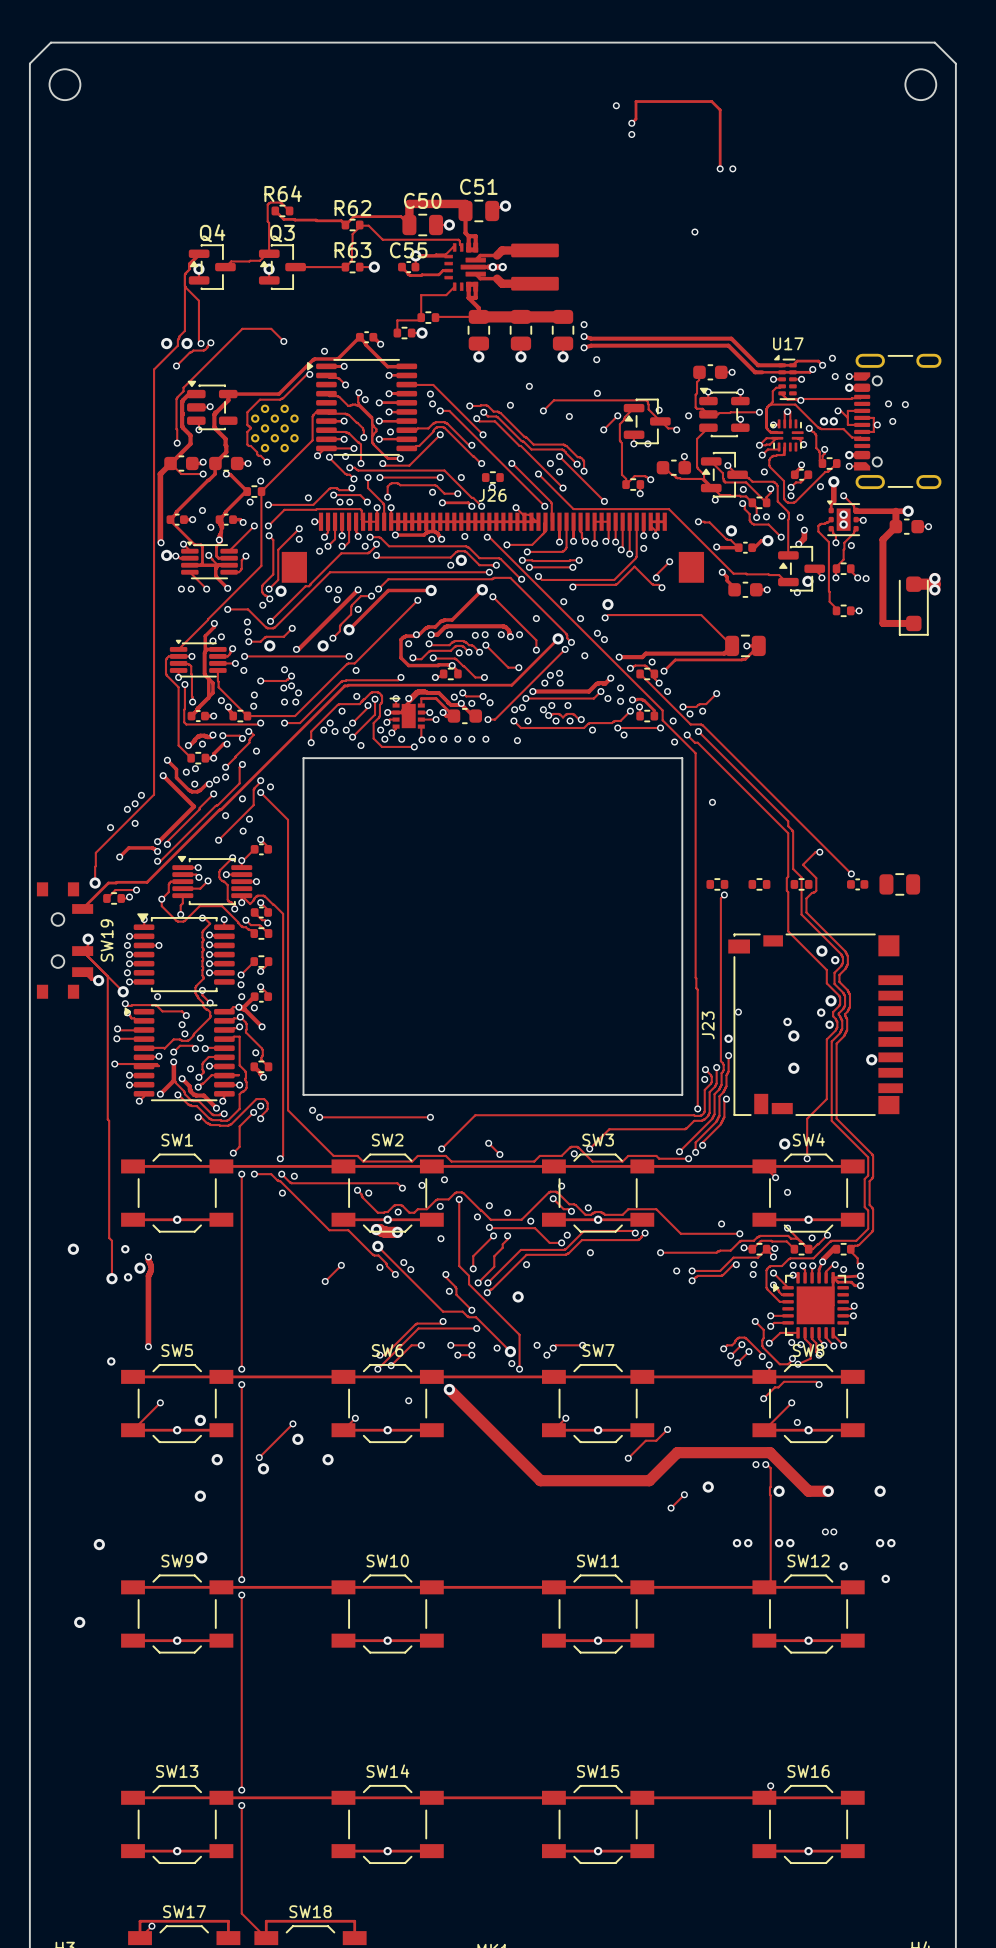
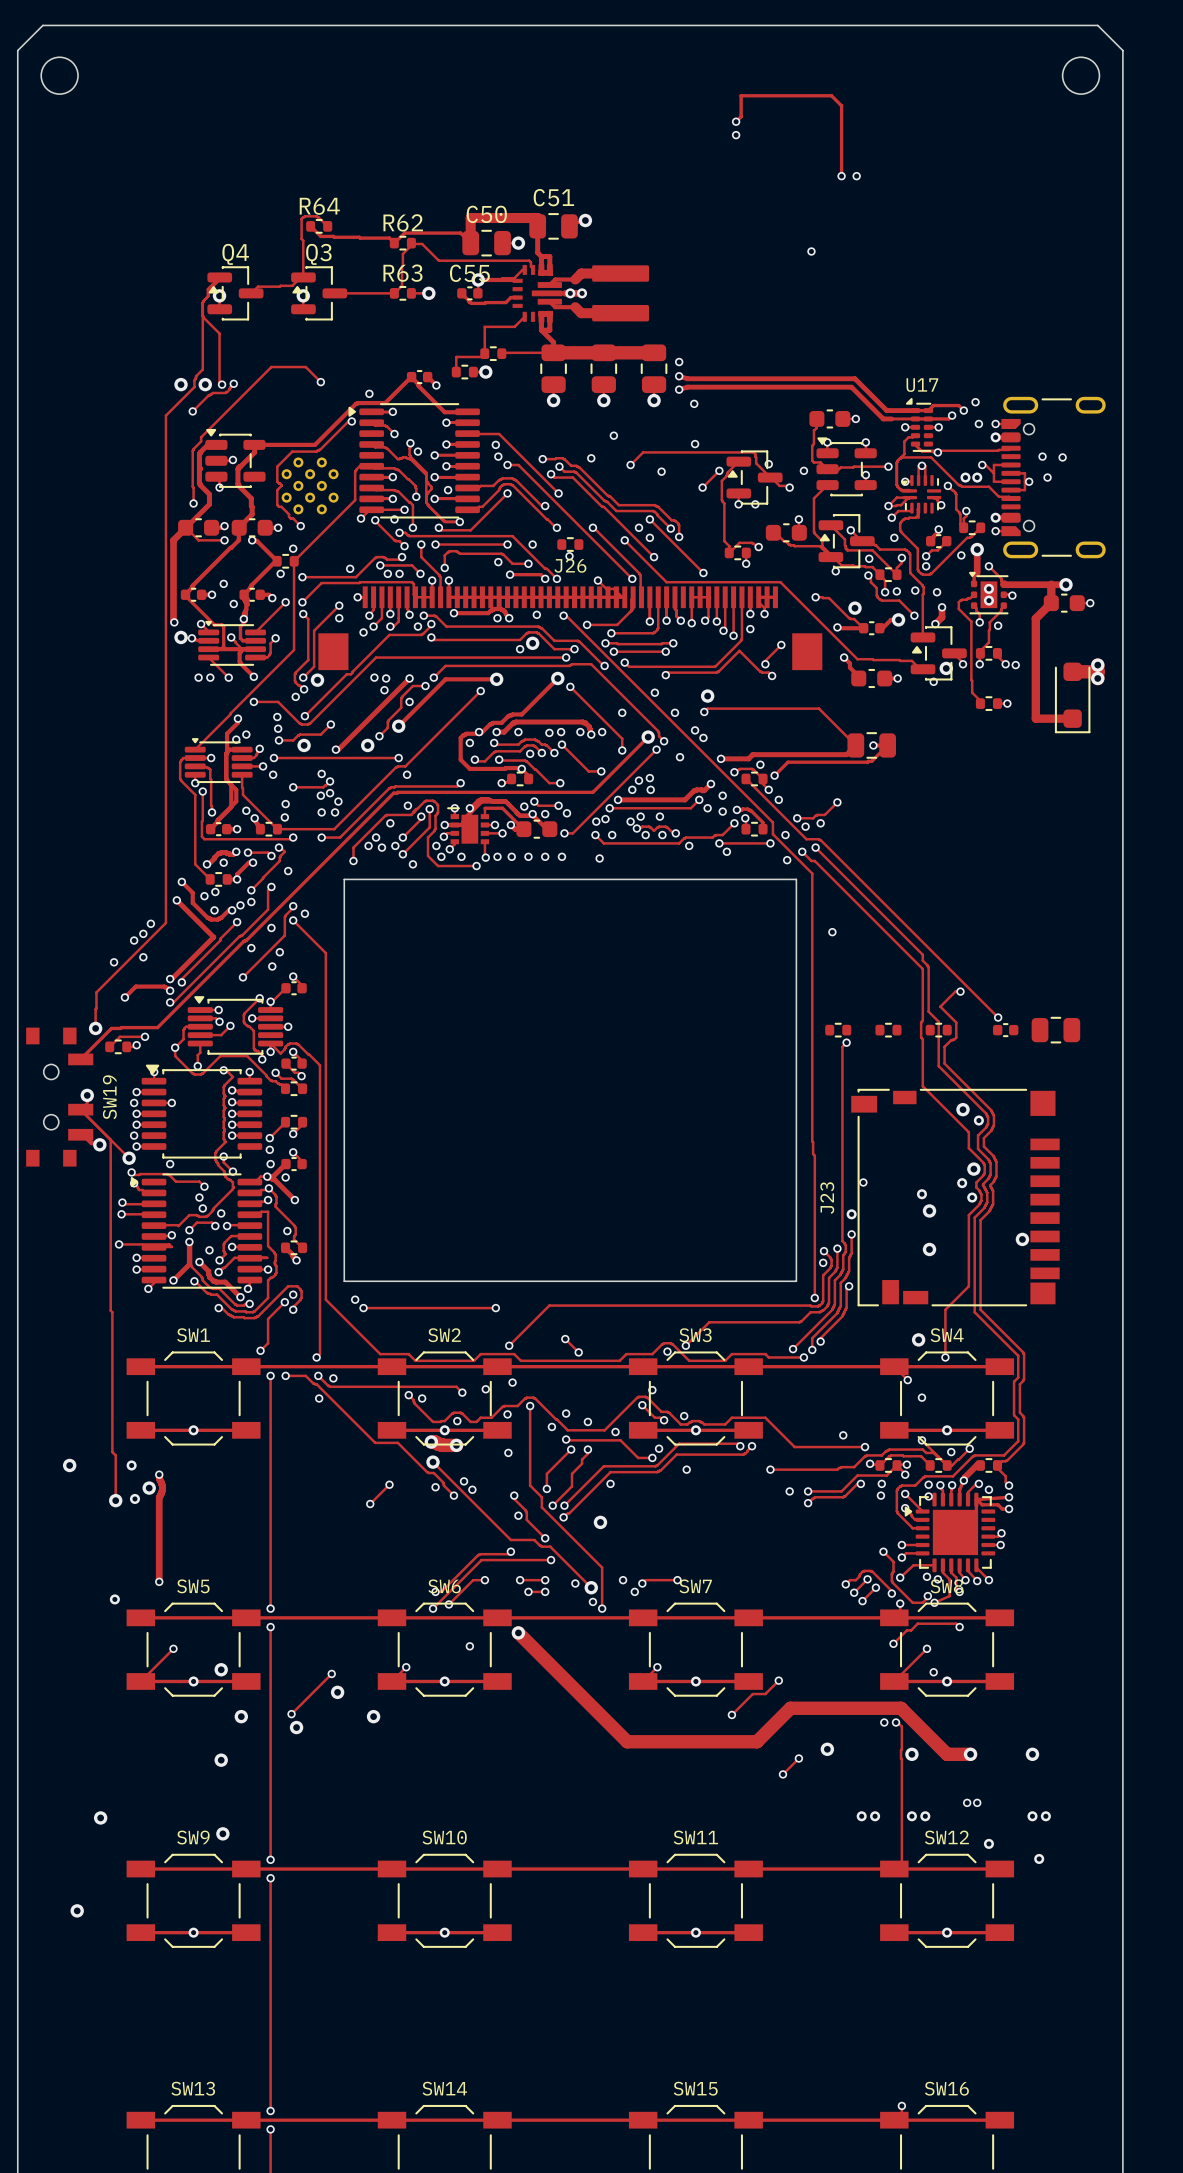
via: (616, 105) -> none

